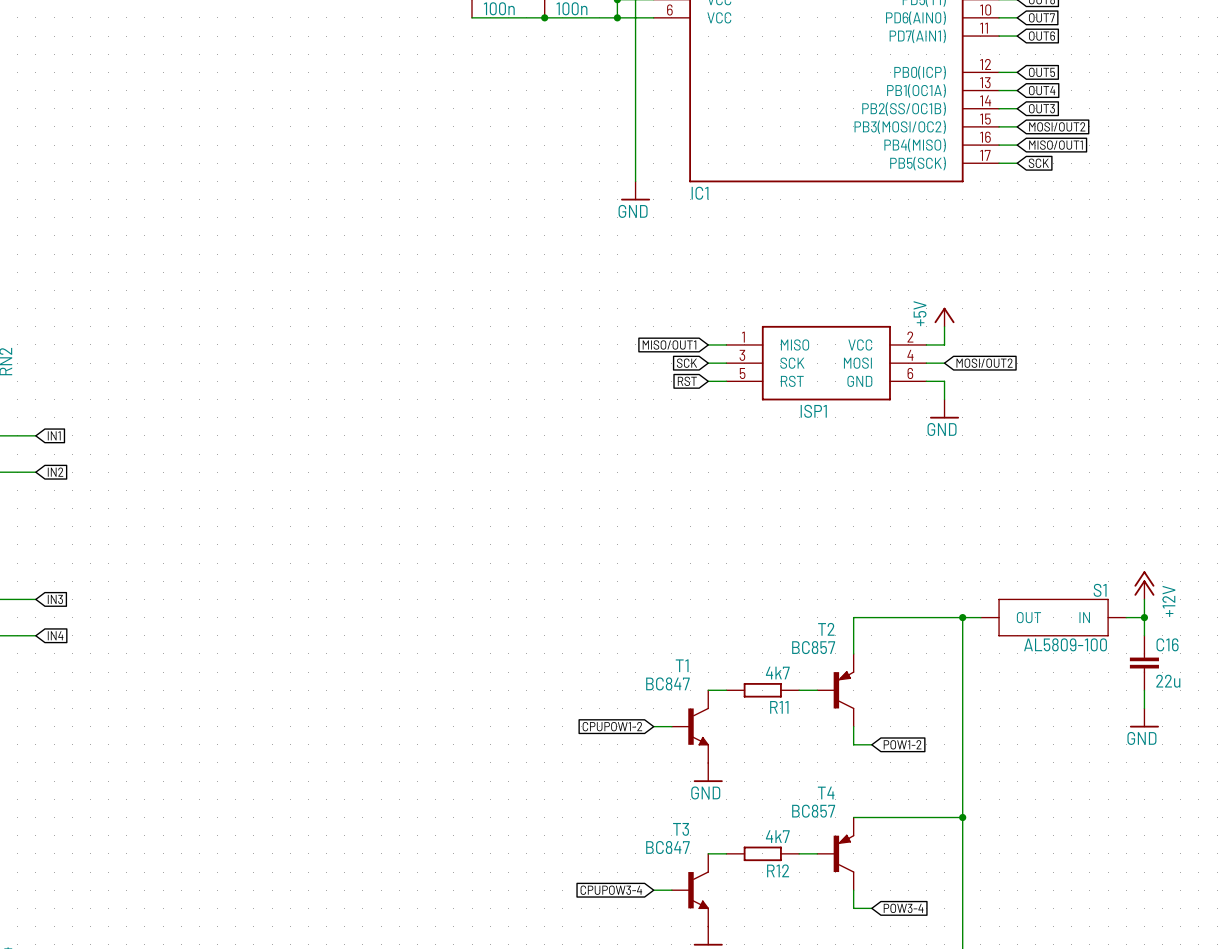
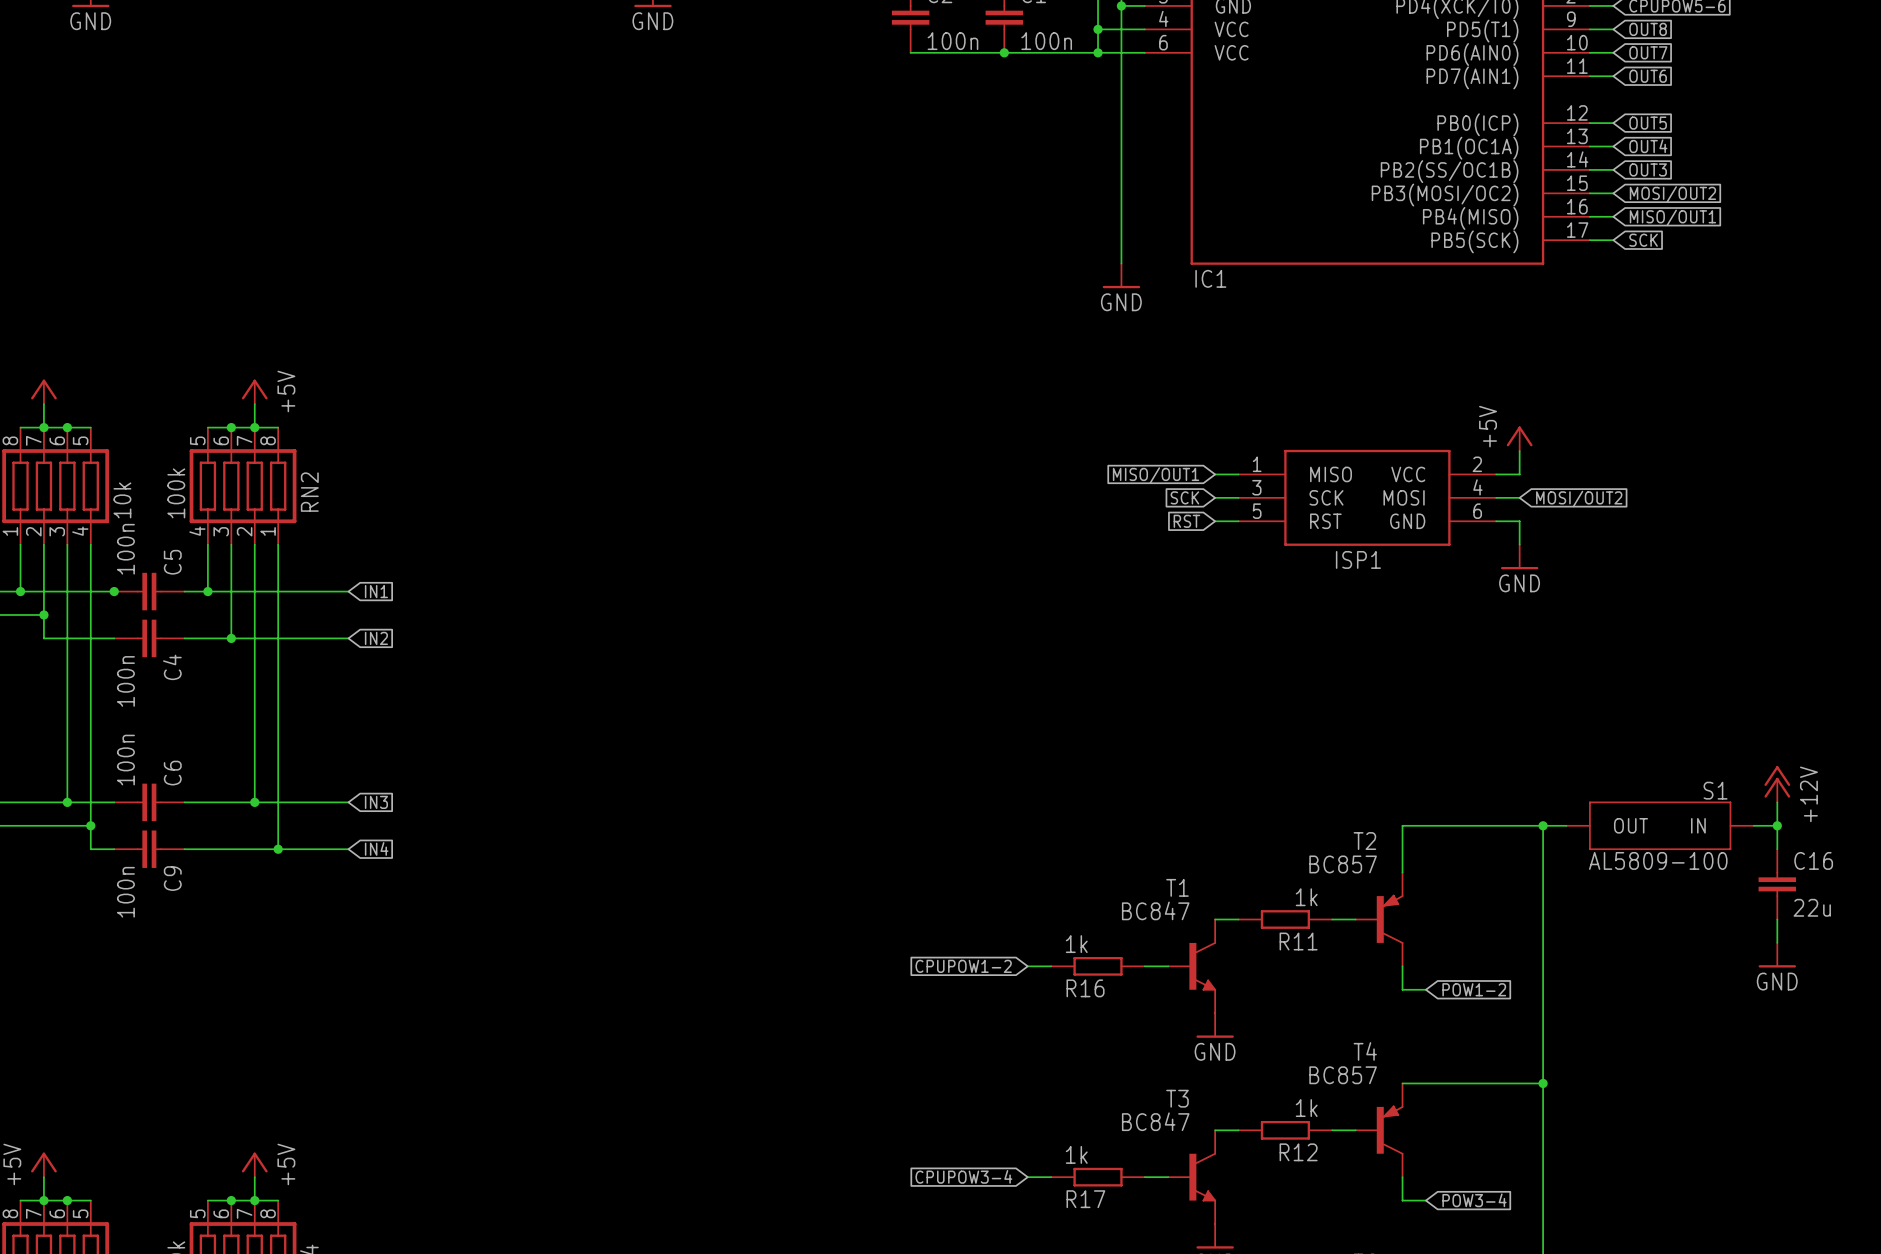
R11 value: 4k7 (777, 673) -> 1k (1306, 897)
wire: none -> (1027, 966) (1051, 966)
global label position: CPUPOW1-2 (612, 726) -> CPUPOW1-2 (963, 966)
R16: none -> 1k (1098, 966)
R12 value: 4k7 (777, 836) -> 1k (1306, 1108)
wire: none -> (1027, 1177) (1051, 1177)
global label position: CPUPOW3-4 (611, 890) -> CPUPOW3-4 (963, 1176)
R17: none -> 1k (1098, 1177)

